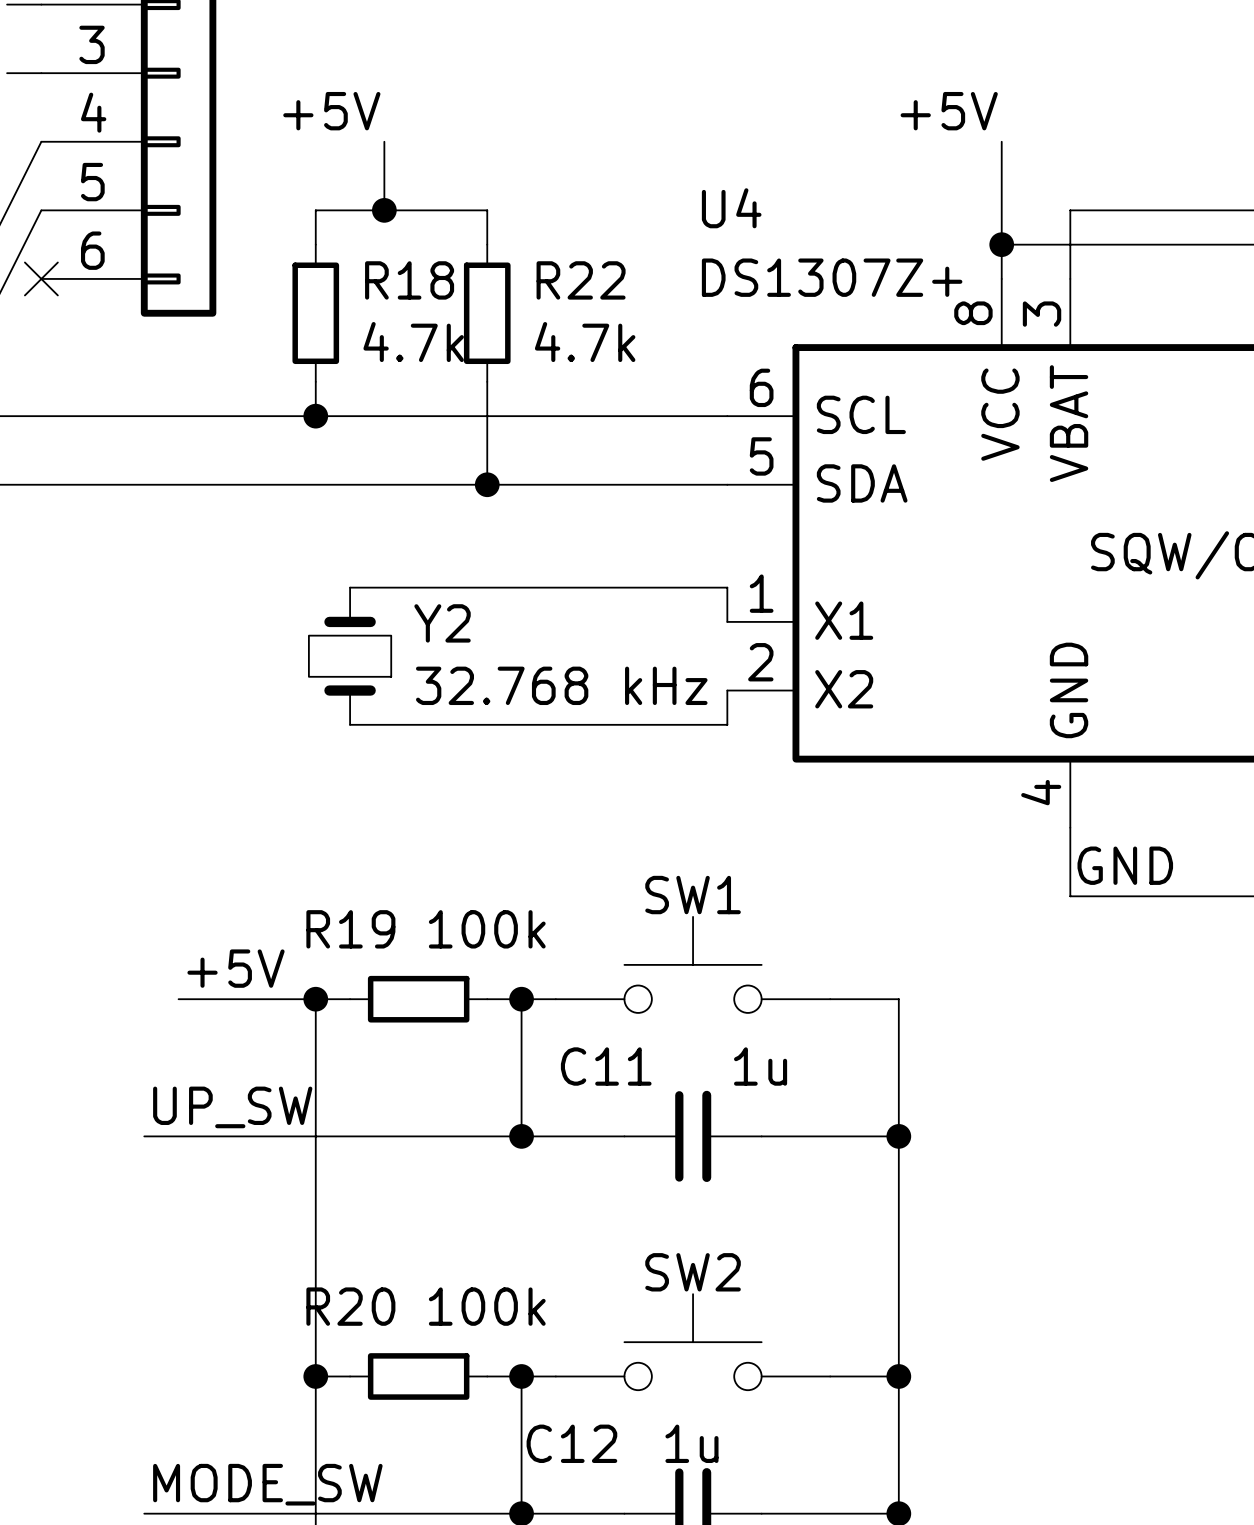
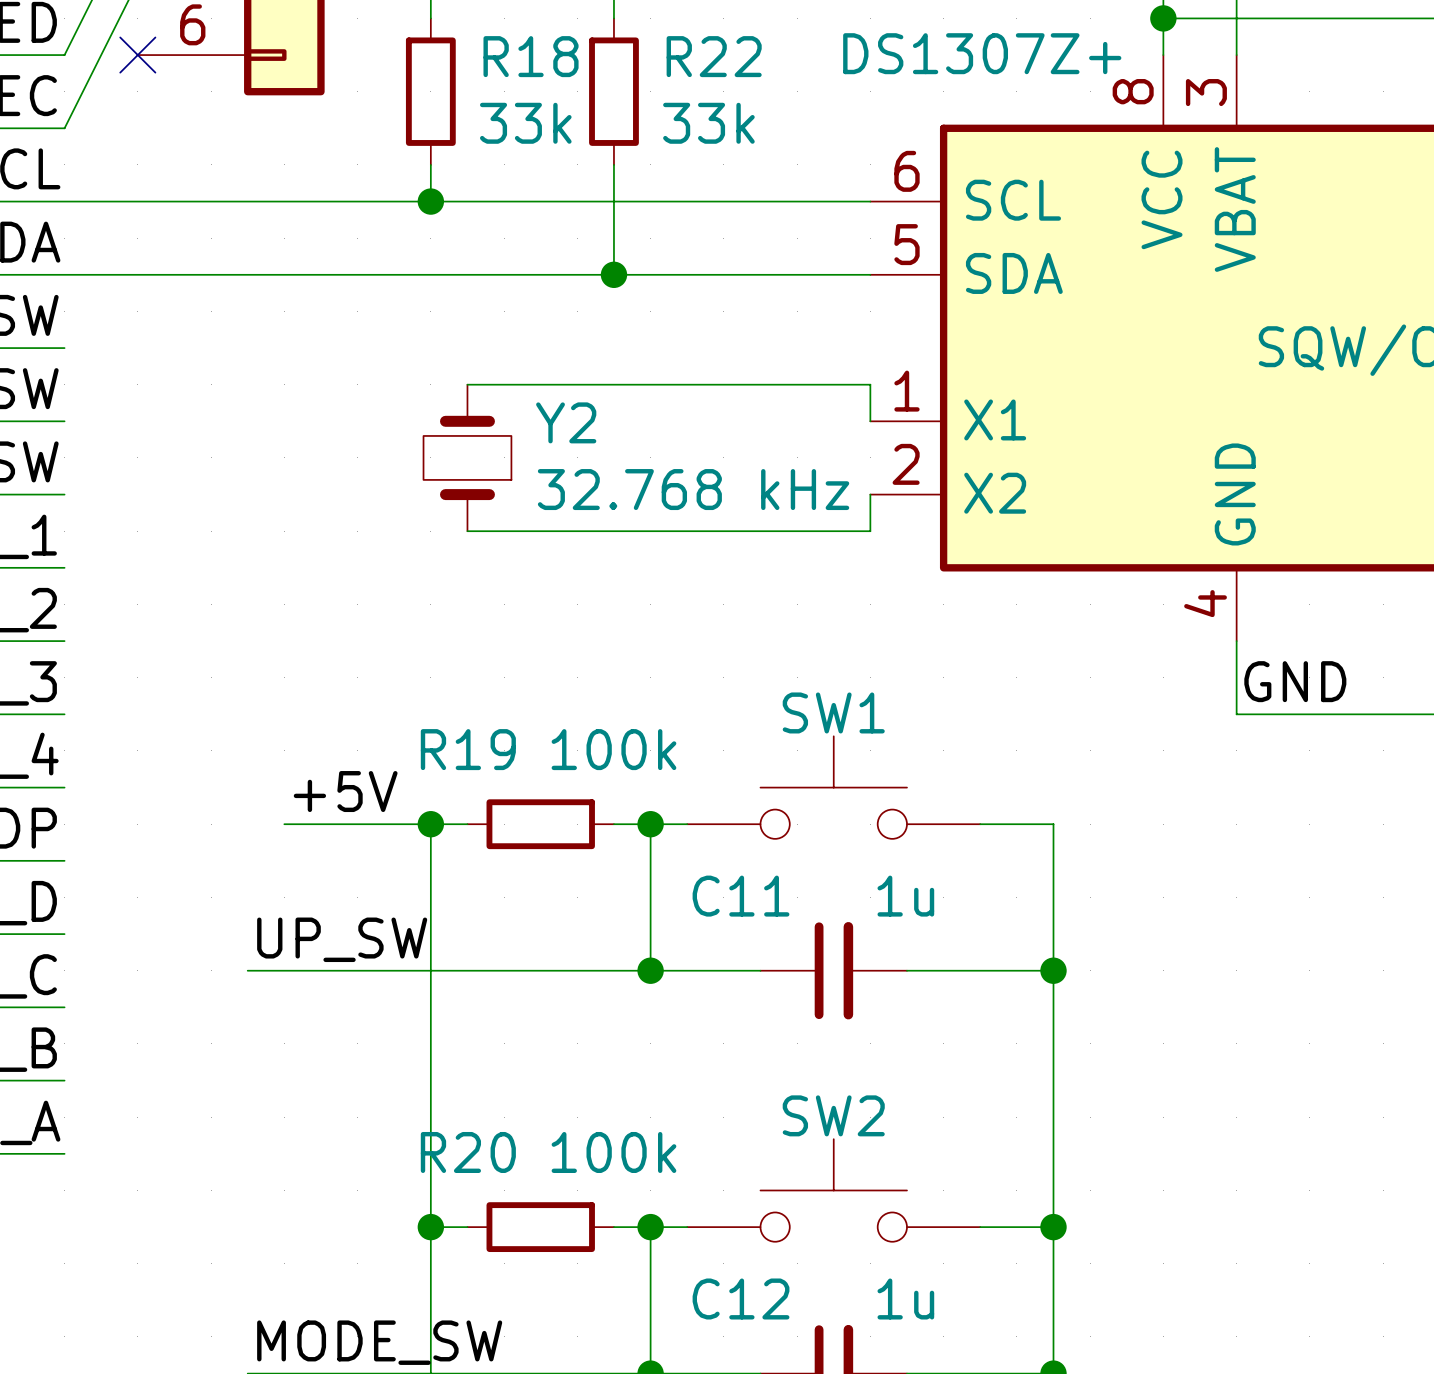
R18 value: 4.7k (413, 342) -> 33k (525, 123)
R22 value: 4.7k (585, 342) -> 33k (708, 123)
C12 name position: C12 (571, 1443) -> C12 (741, 1298)
C12 value position: 1u (691, 1443) -> 1u (905, 1298)

